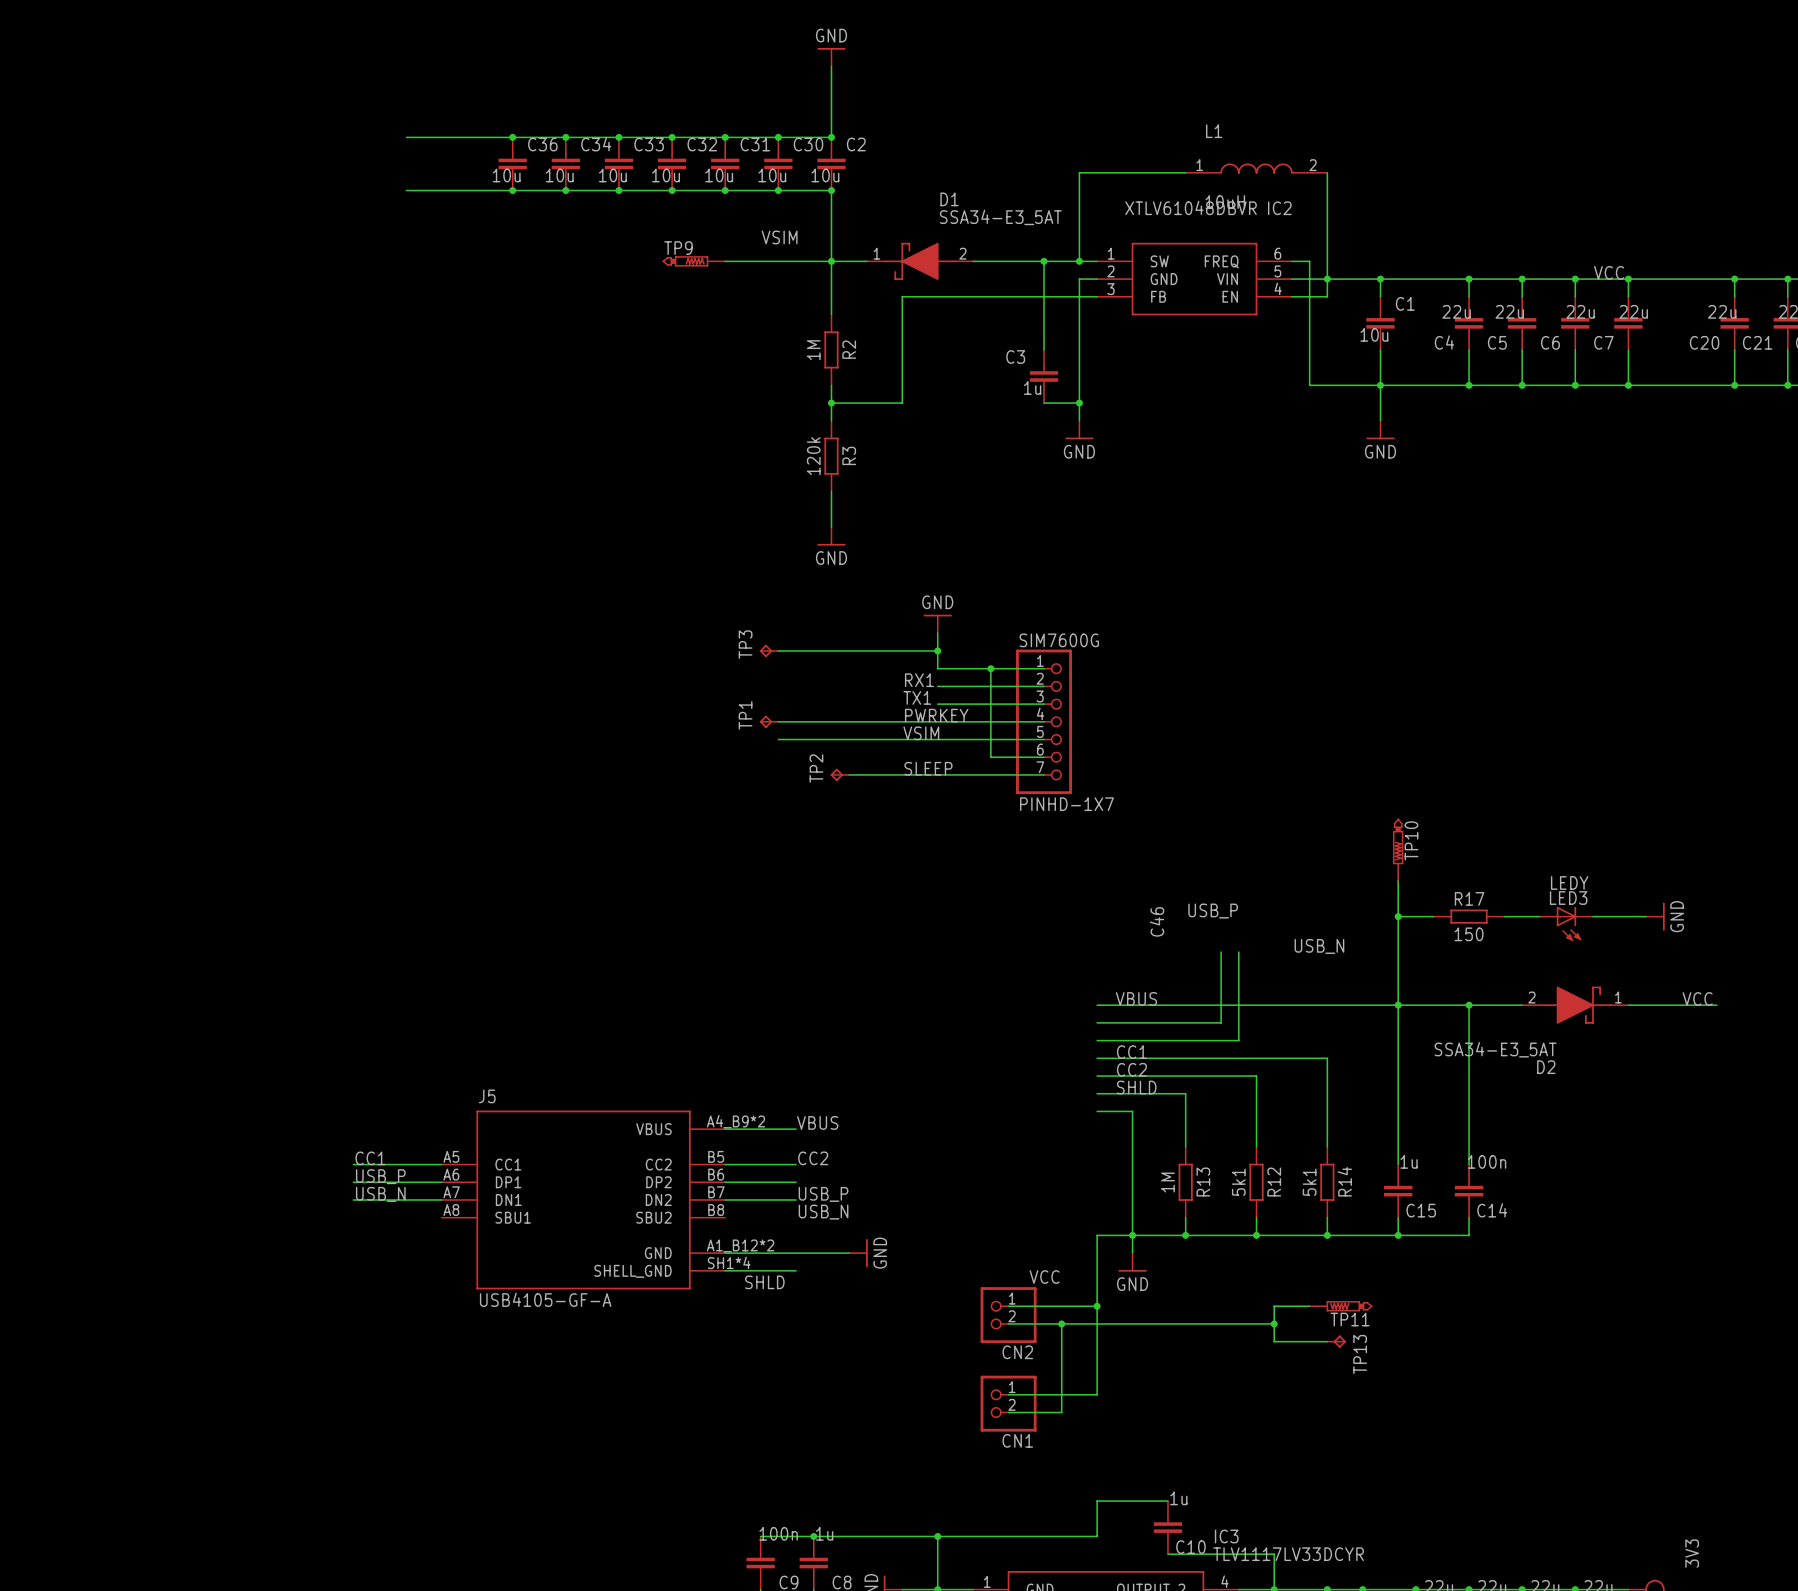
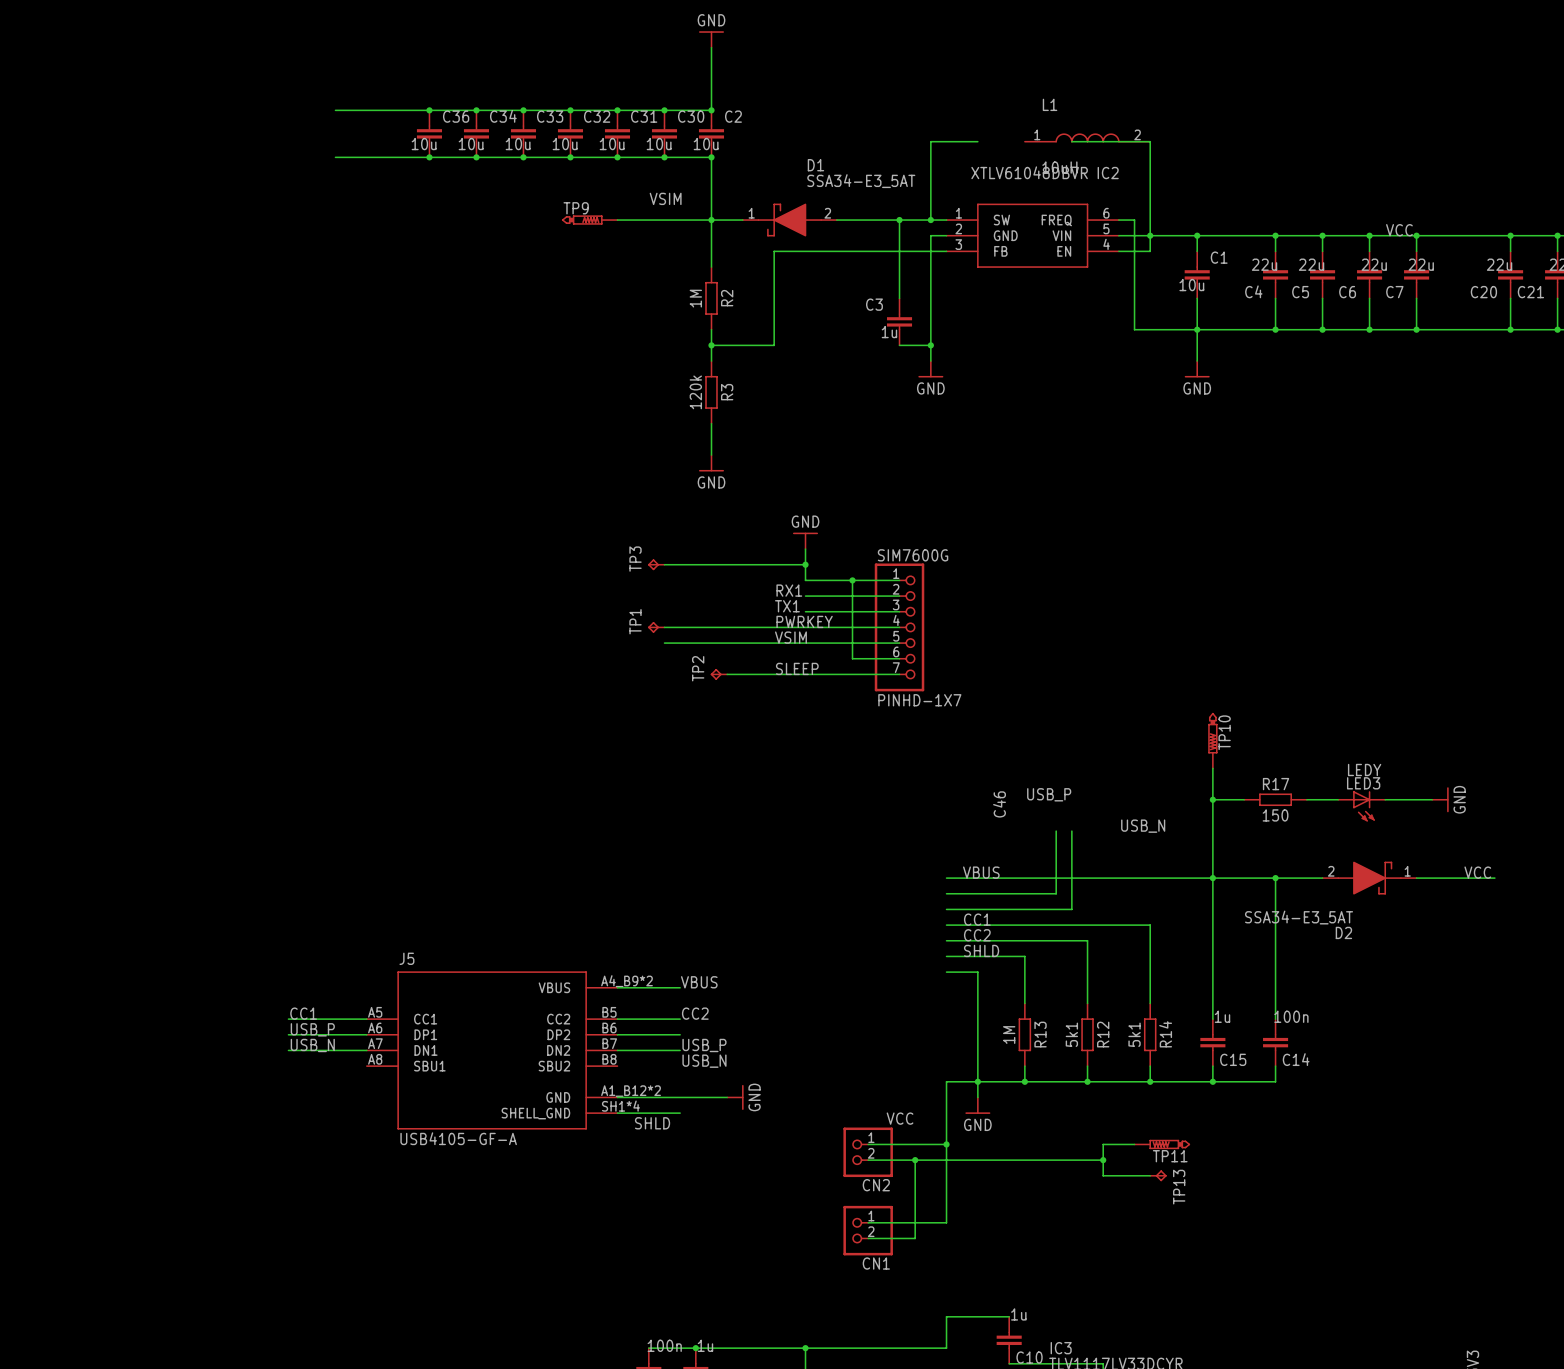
wire: (1132, 172) (1185, 172) -> none
wire: none -> (1071, 141) (1150, 141)

